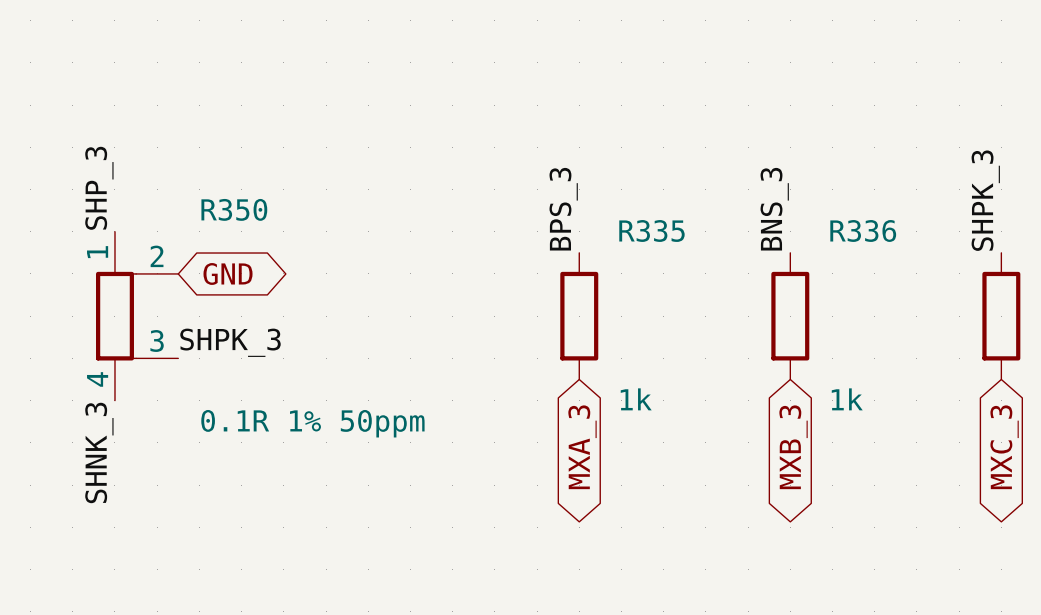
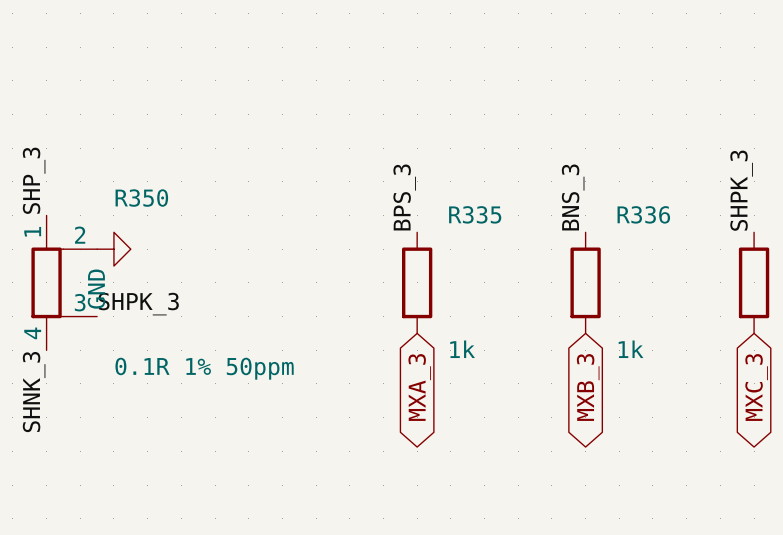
power symbol: none -> GND (113, 249)
global label: GND (228, 273) -> none

